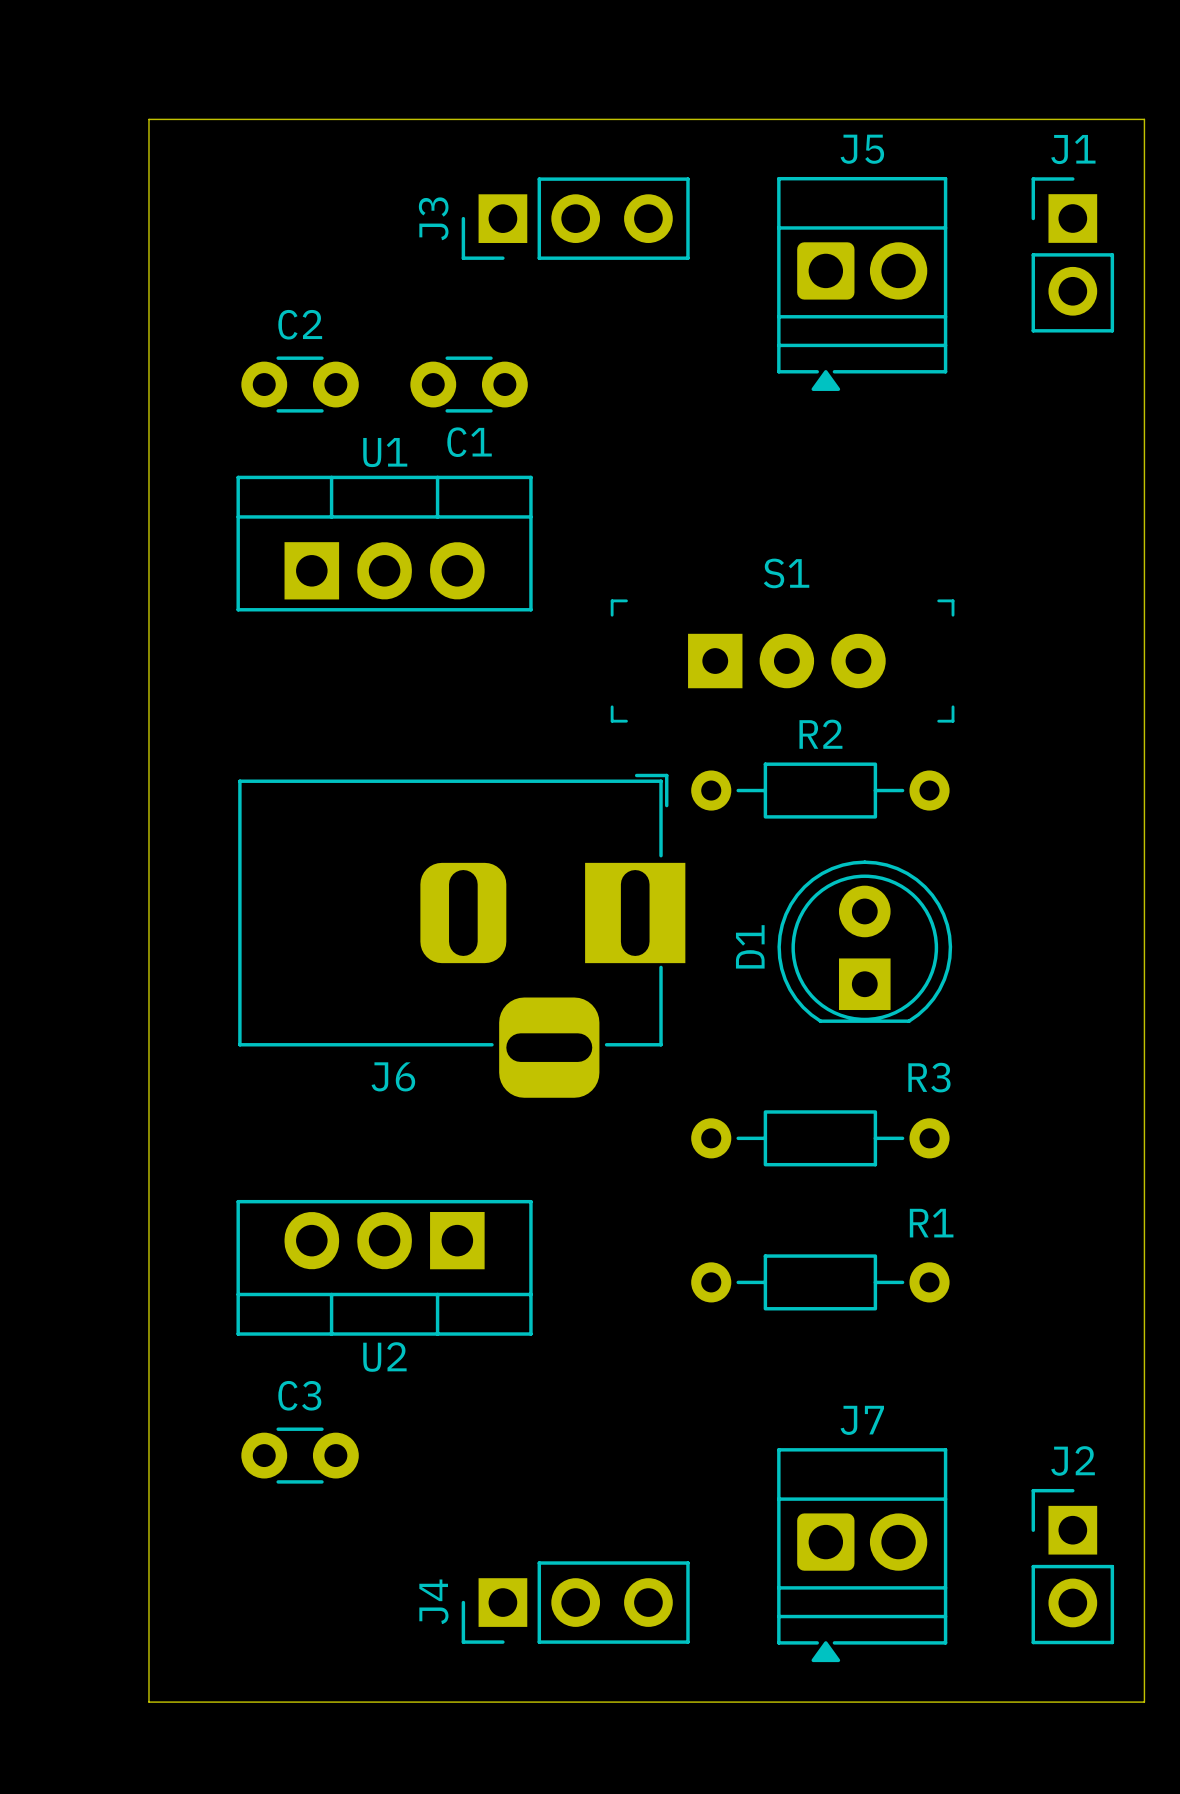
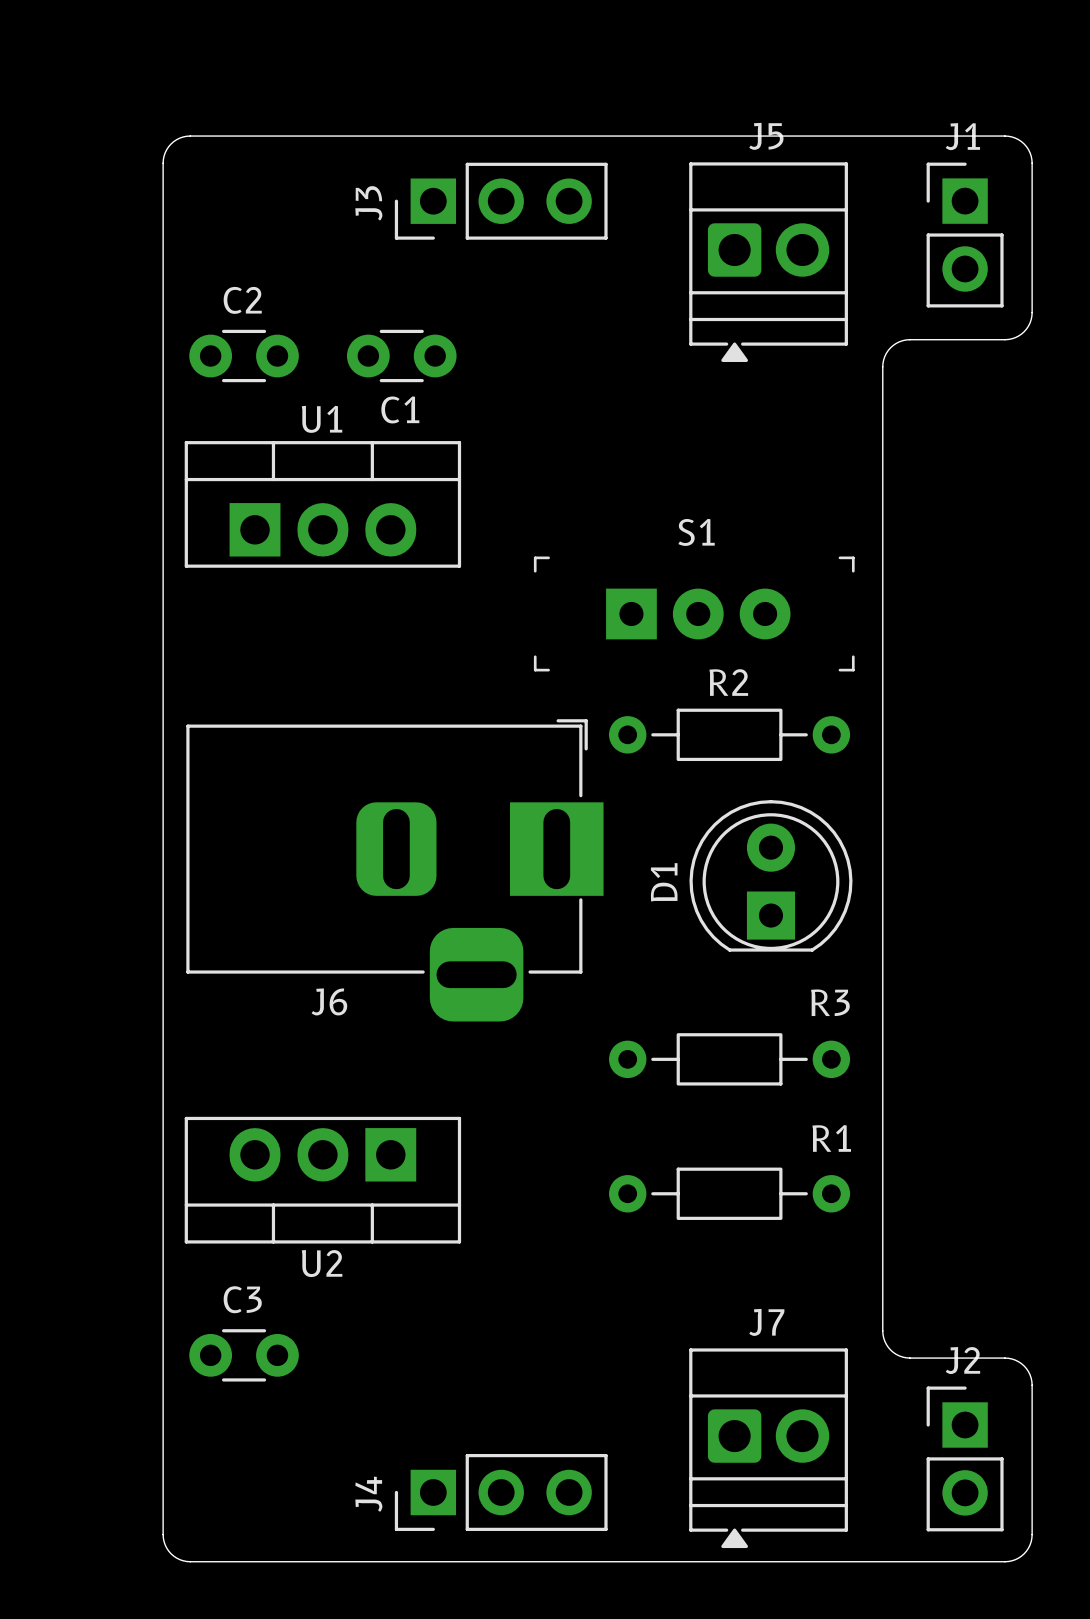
board edge: (148, 119) (1144, 119) (1144, 1702) (148, 1702) (148, 119) -> (190, 136) (179, 138) (171, 143) (165, 152) (163, 163) (163, 1534) (166, 1548) (176, 1558) (190, 1561) (1004, 1561) (1018, 1558) (1028, 1548) (1032, 1534) (1032, 1385) (1028, 1371) (1018, 1361) (1008, 1358) (902, 1357) (888, 1347) (883, 1334) (882, 366) (888, 350) (902, 340) (1008, 339) (1018, 336) (1026, 329) (1032, 312) (1032, 163) (1028, 149) (1018, 139) (1004, 136) (190, 136)

